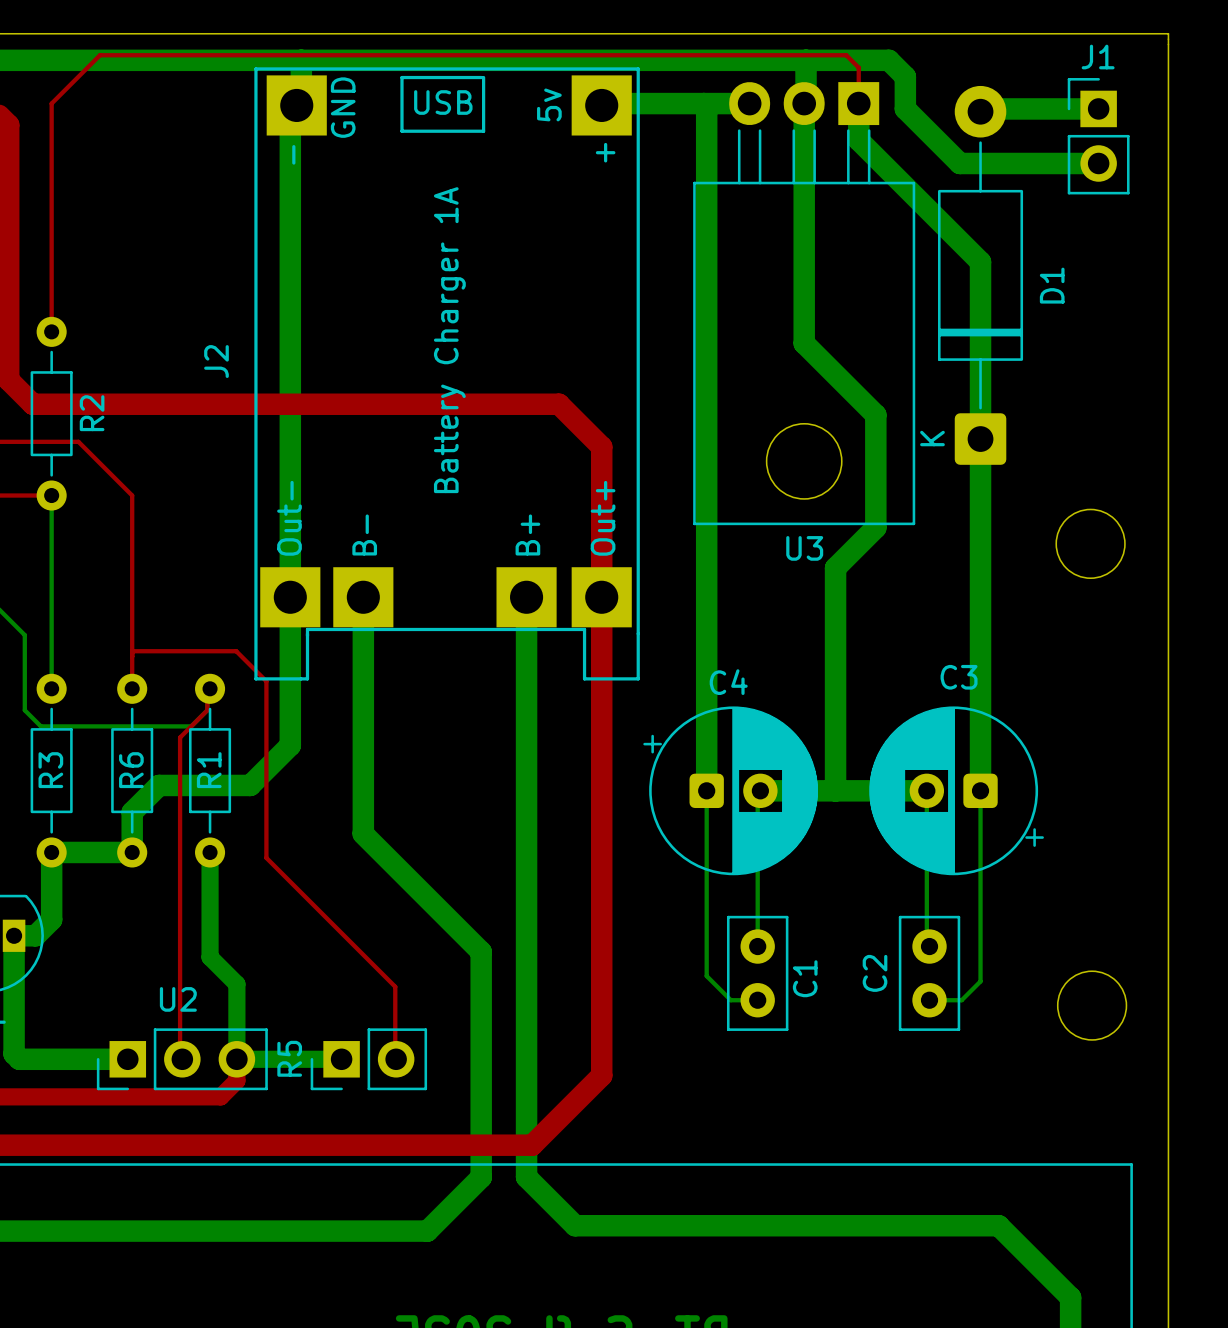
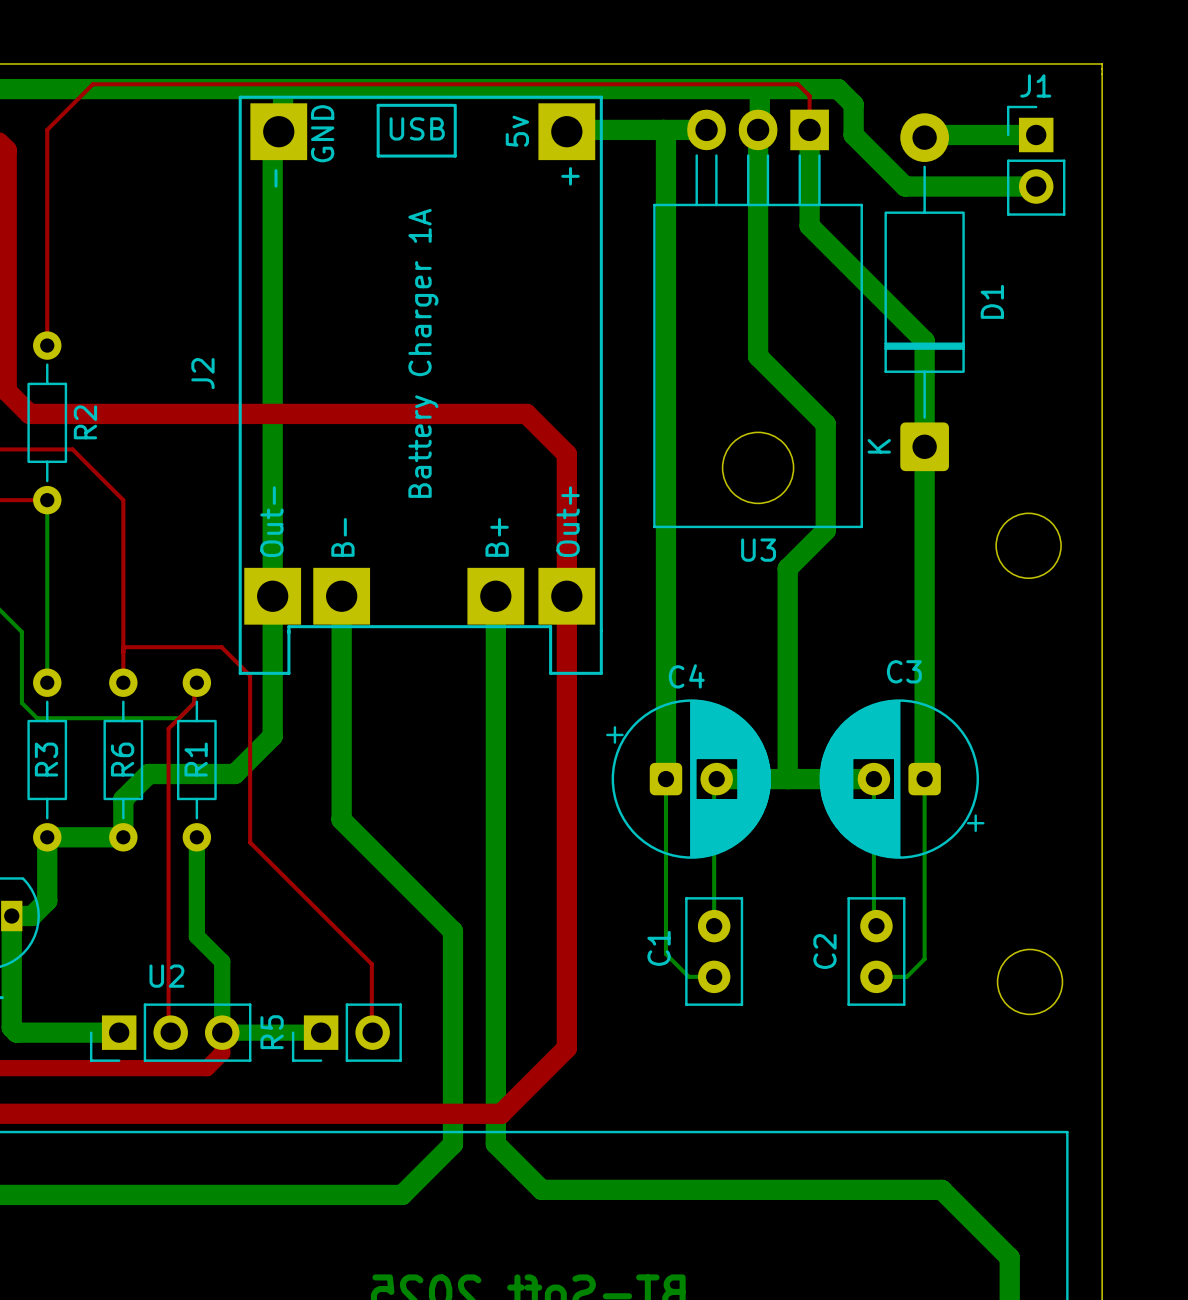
bottom track: (858, 140) (980, 261) (980, 326) -> (809, 164) (809, 225) (924, 340)
C1 name position: C1 (805, 978) -> C1 (659, 948)

